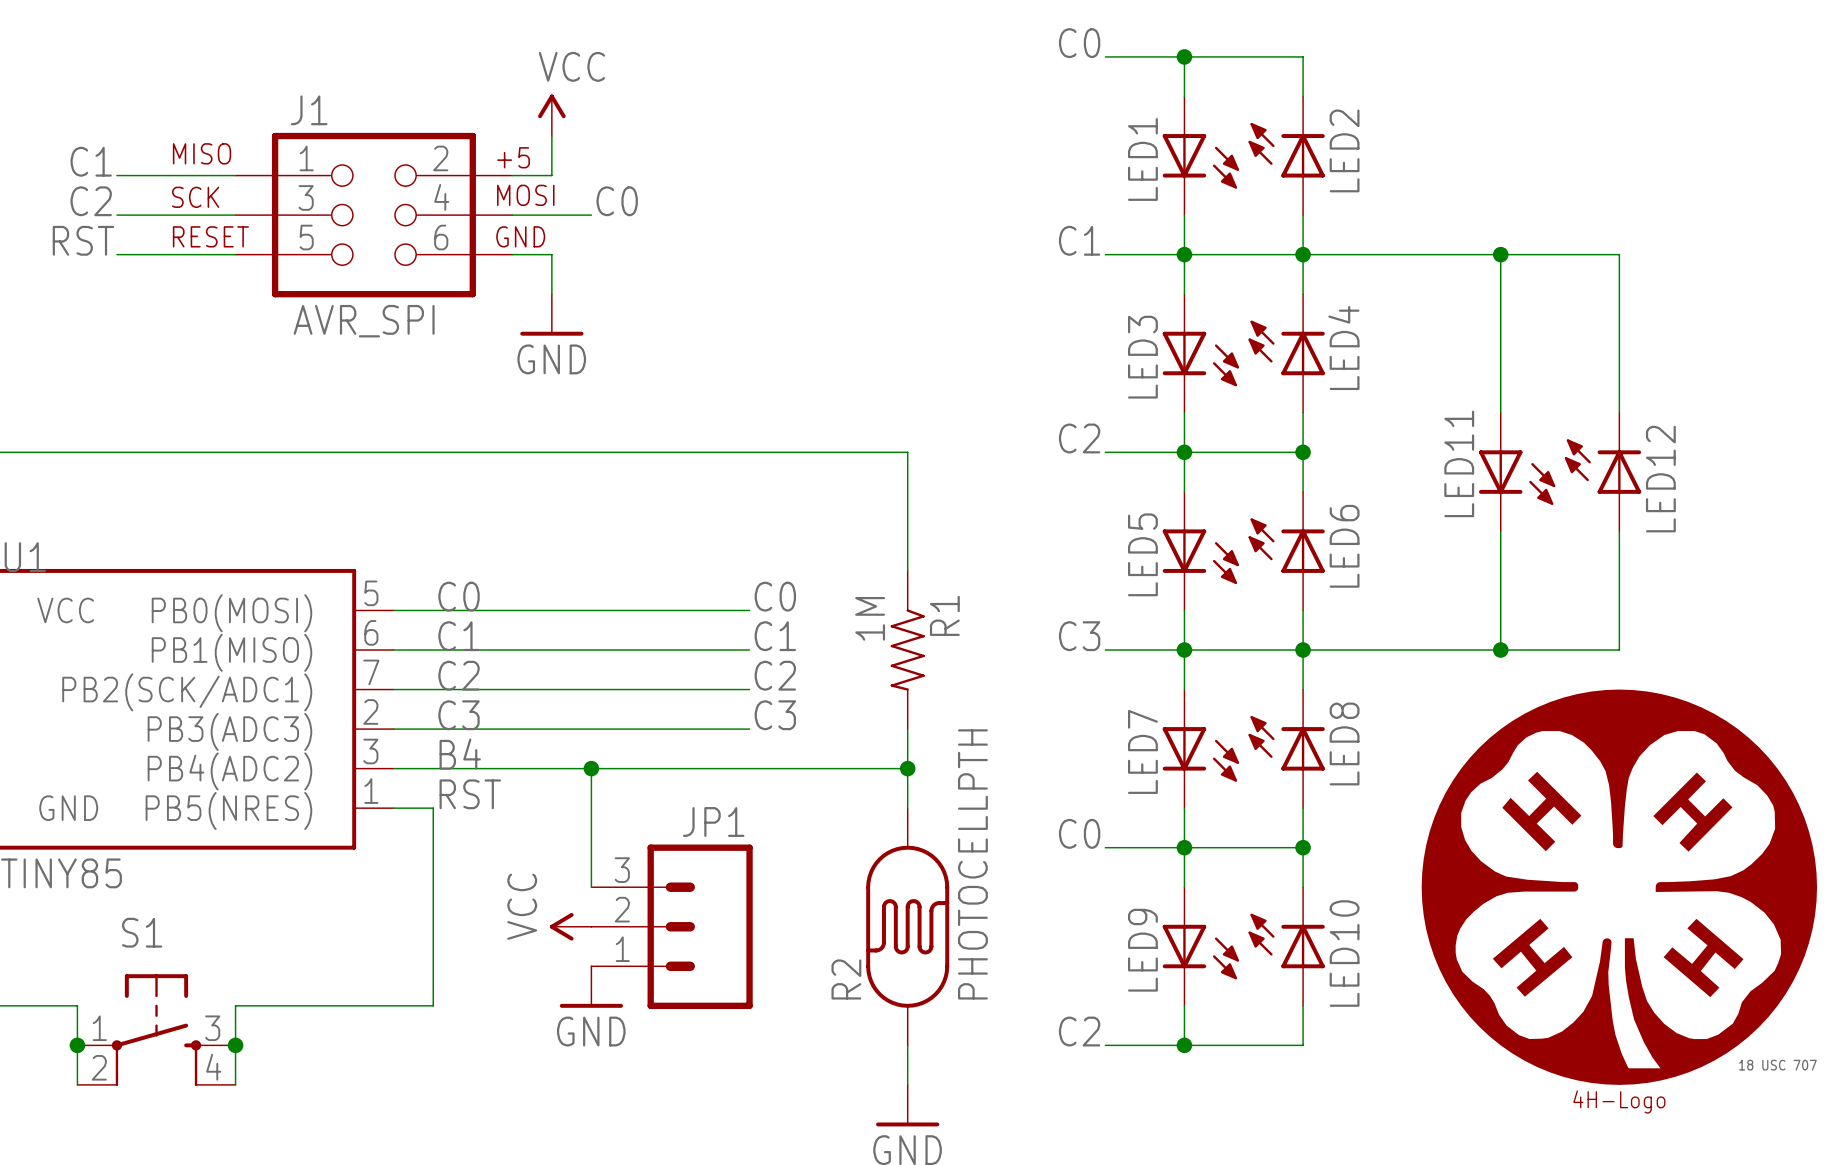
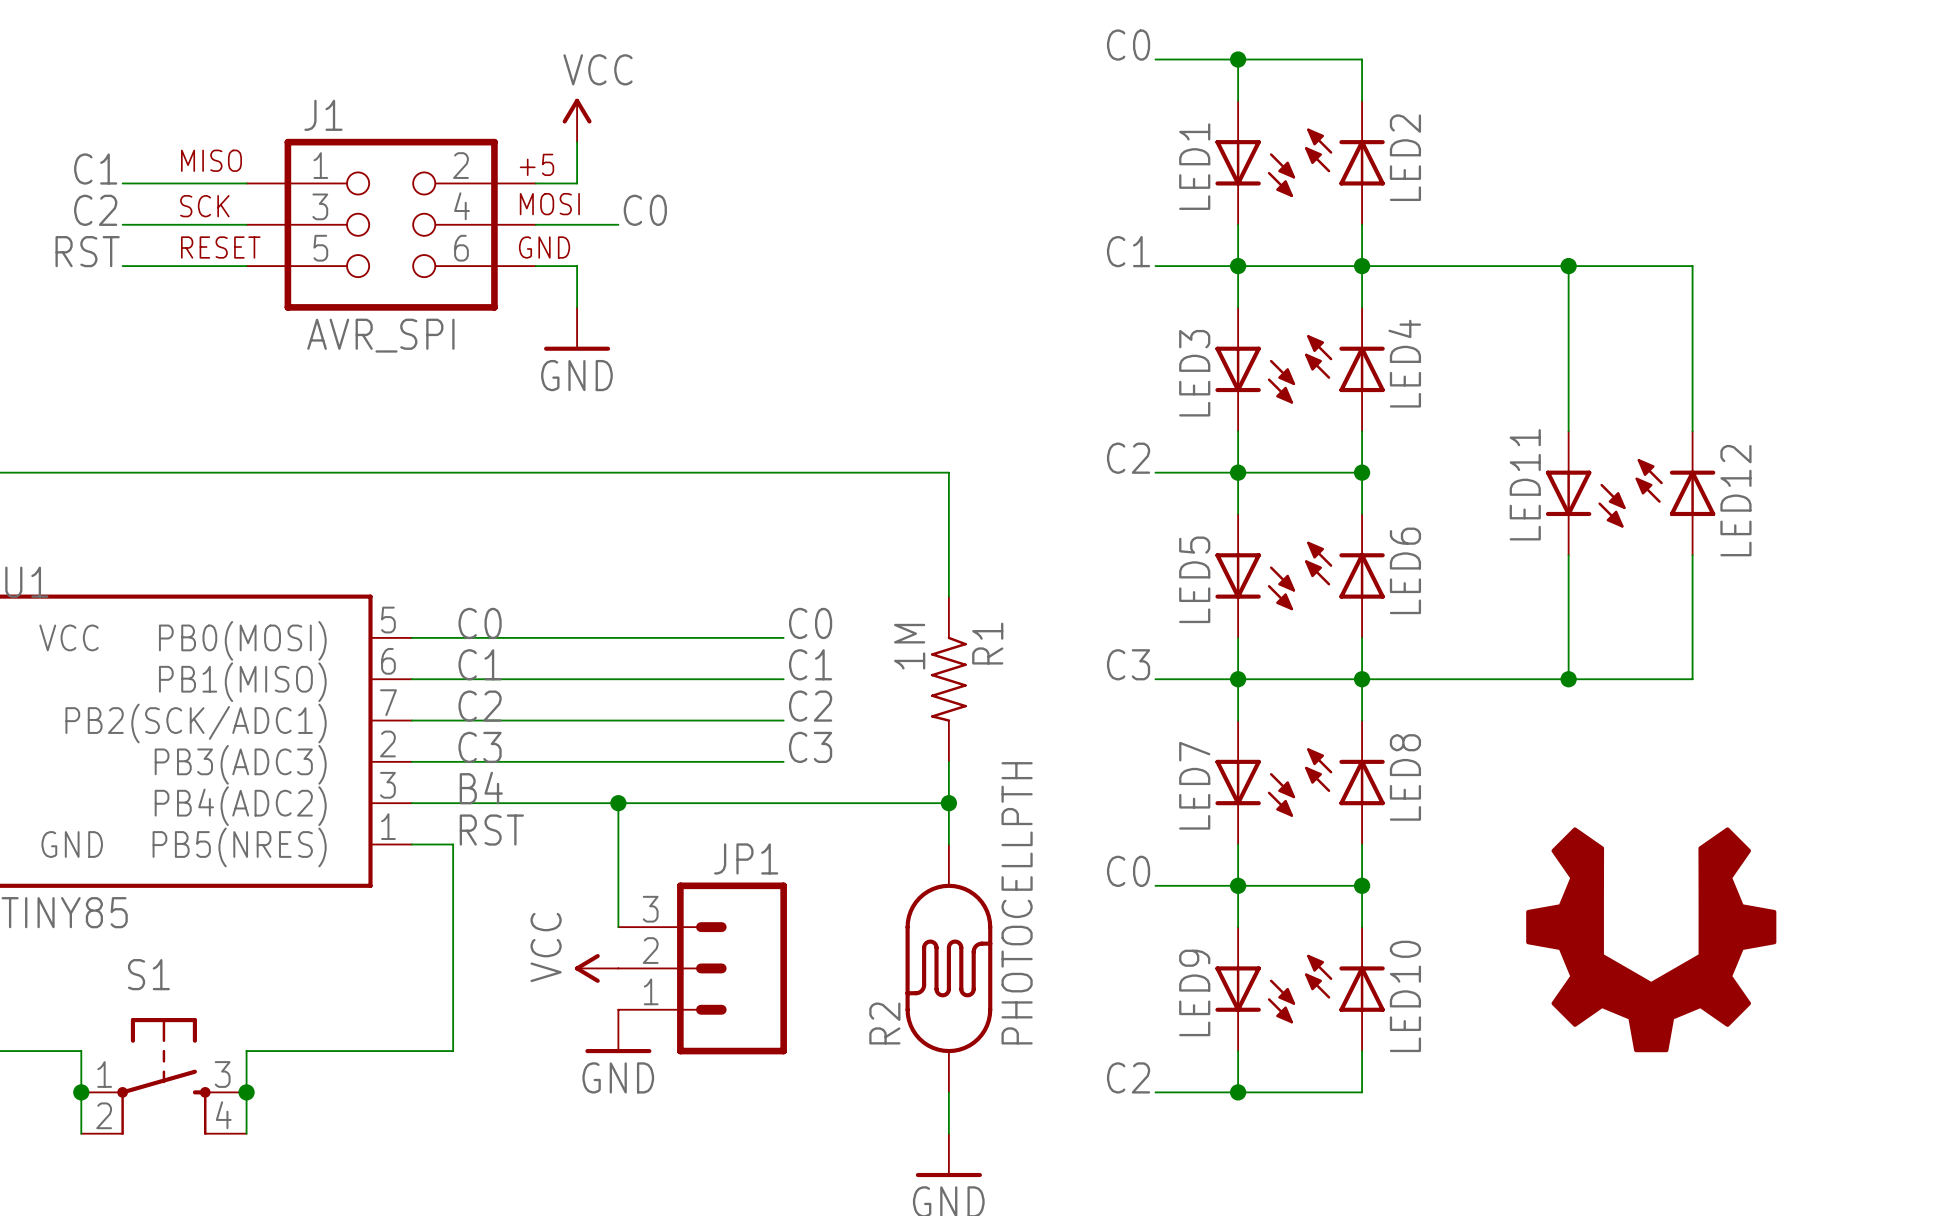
part: 18 USC 707 (1619, 887) -> none
part: none -> (1651, 939)

